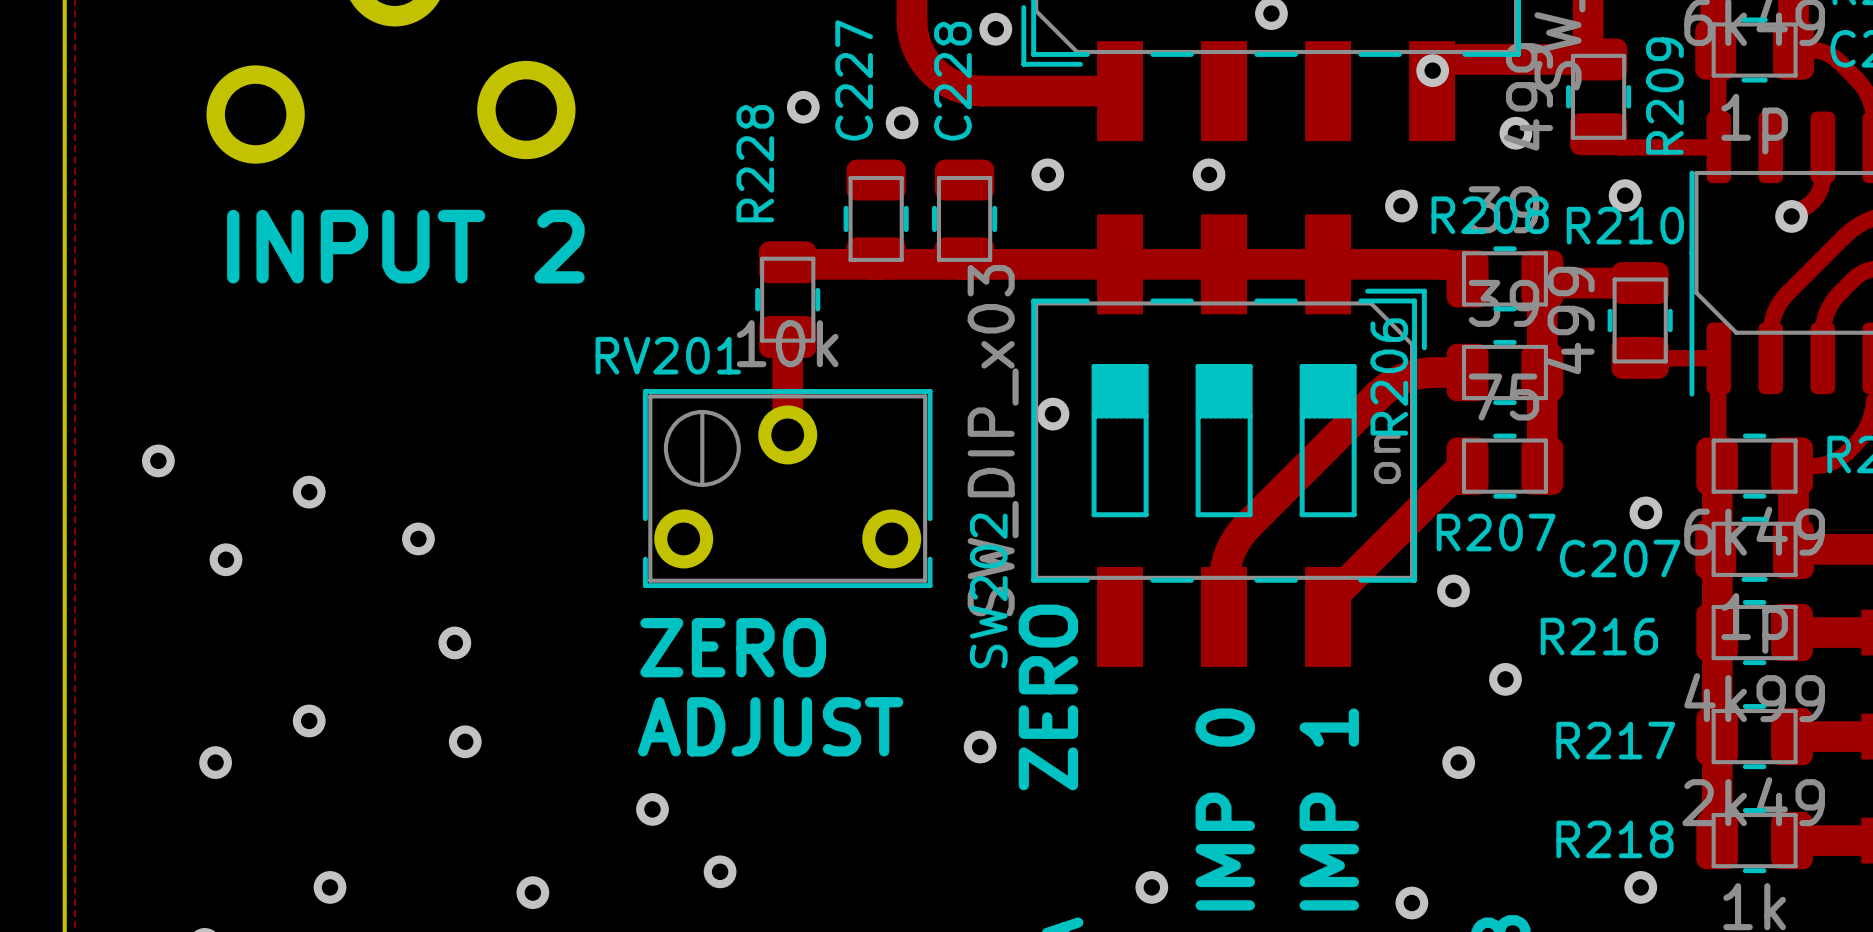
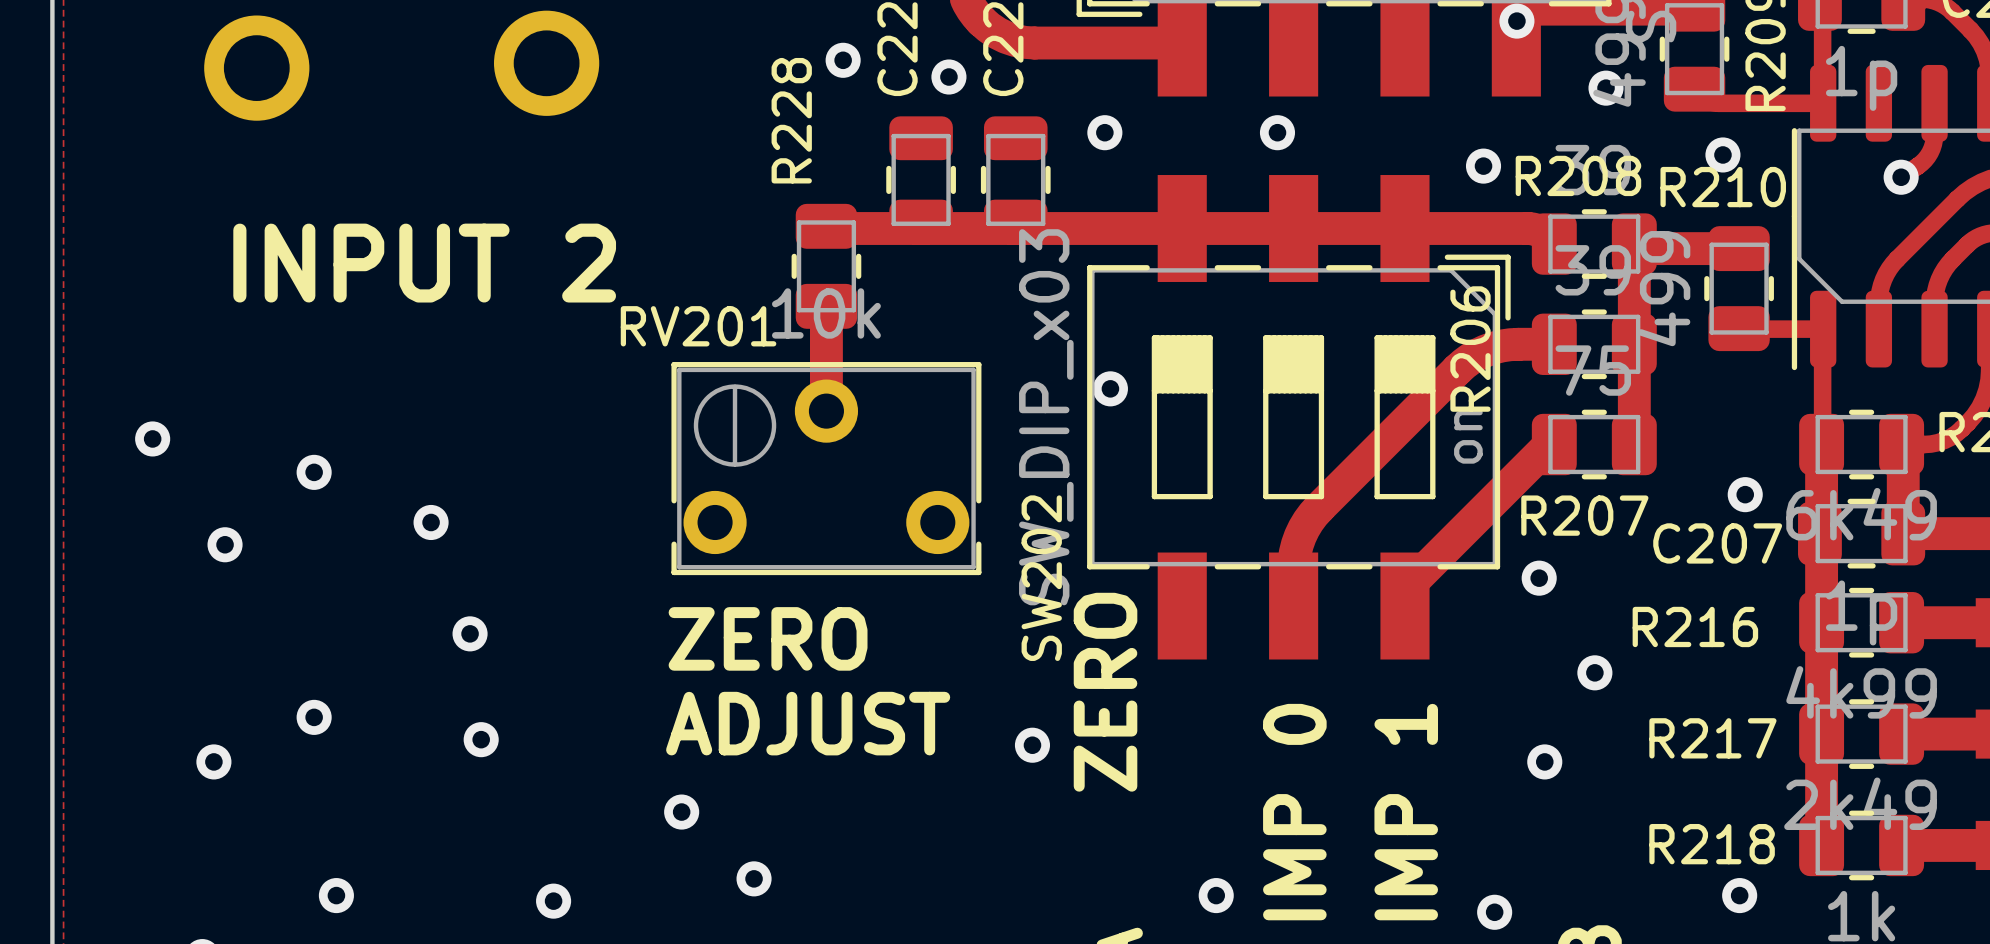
text position: INPUT 2 (405, 246) -> INPUT 2 (424, 263)

